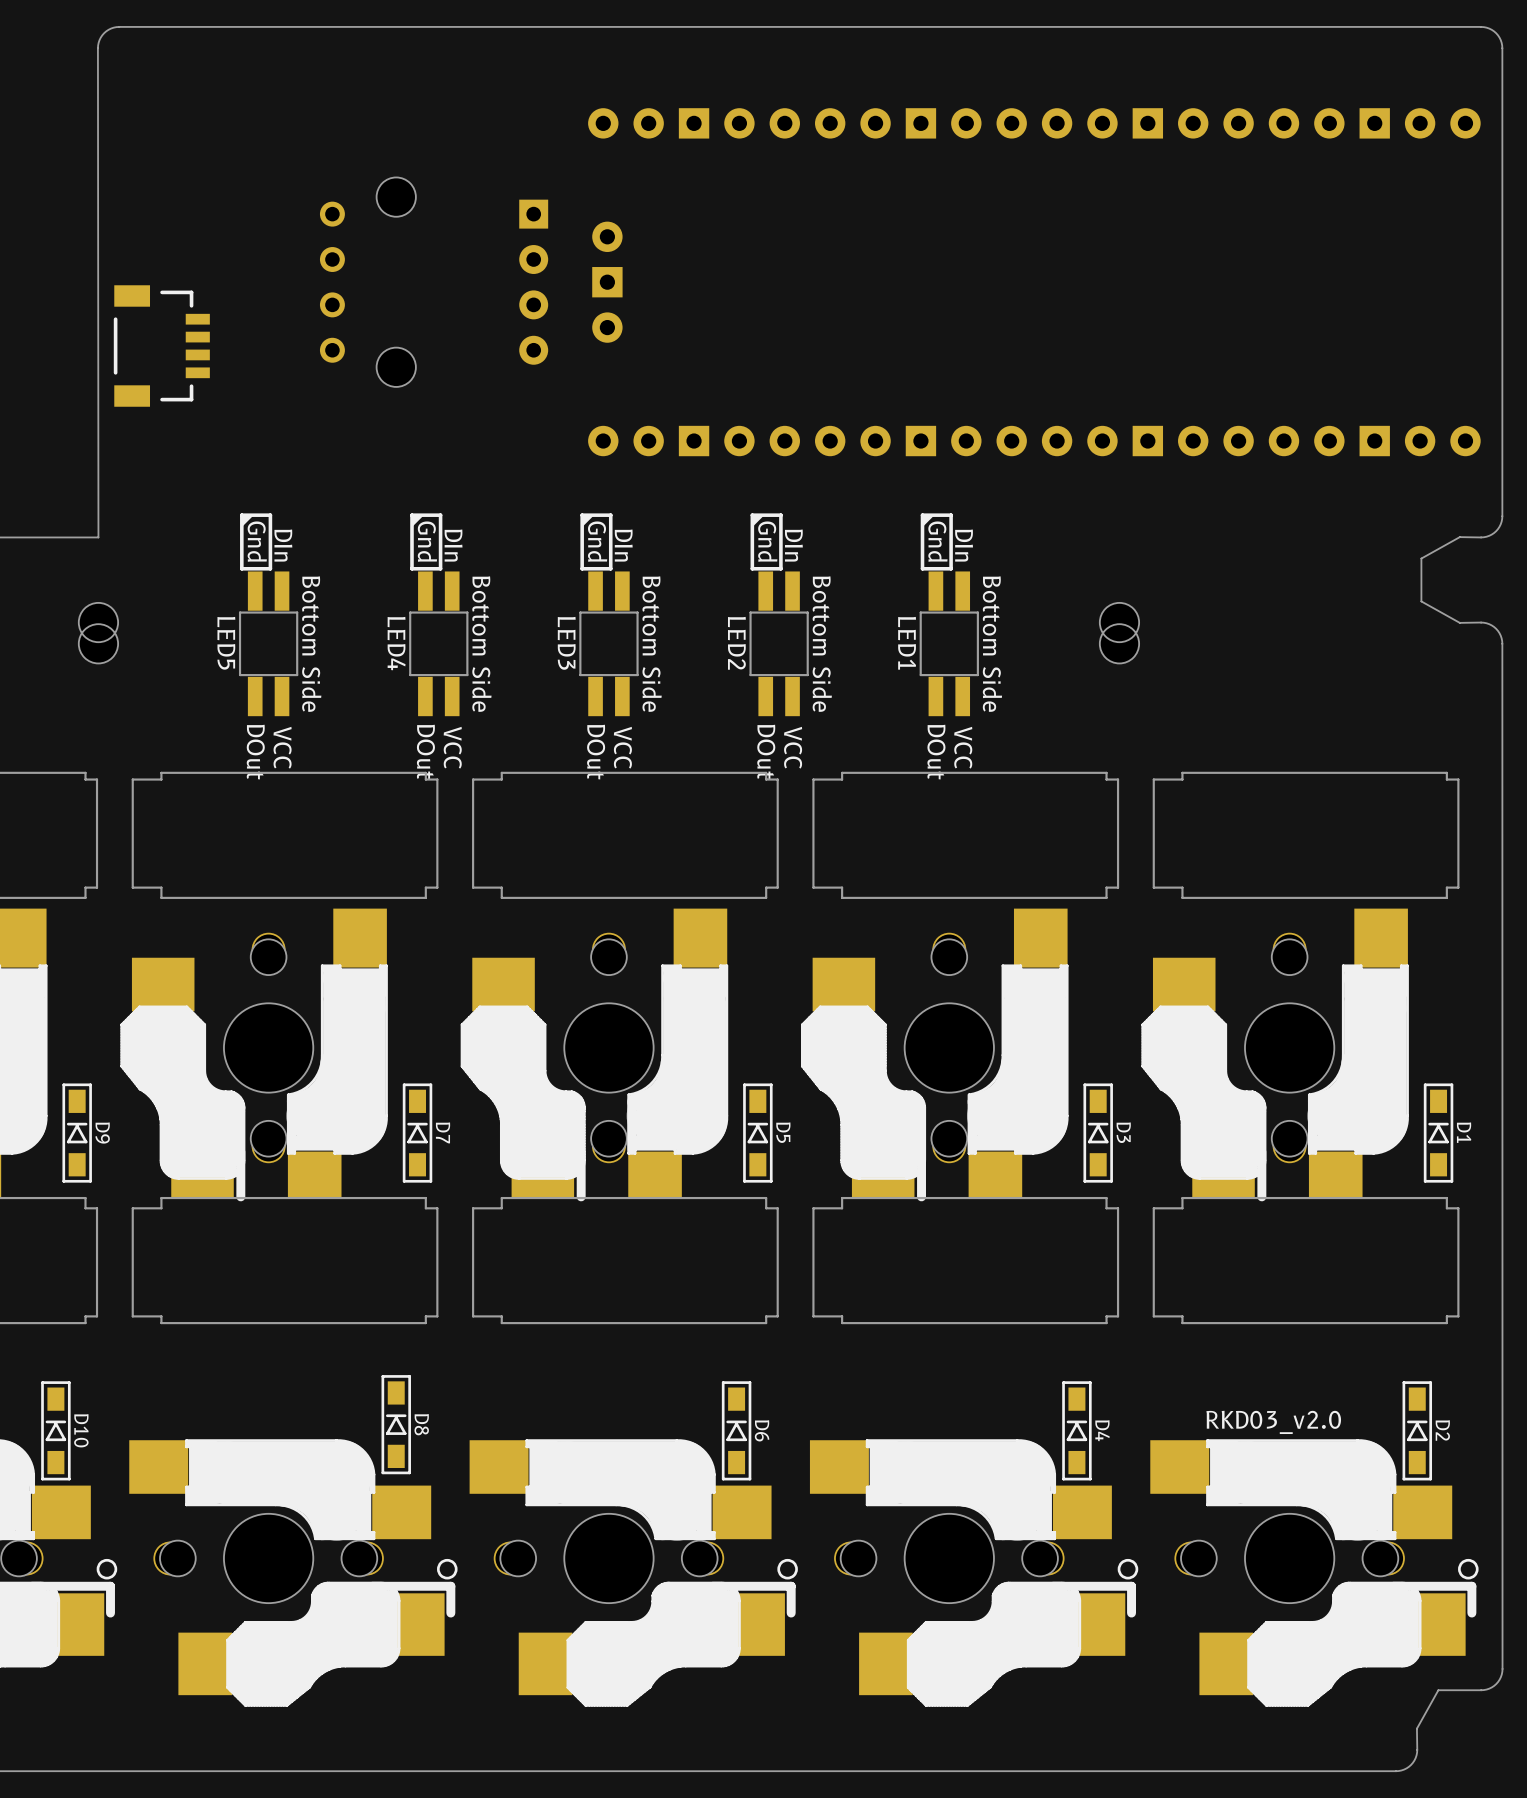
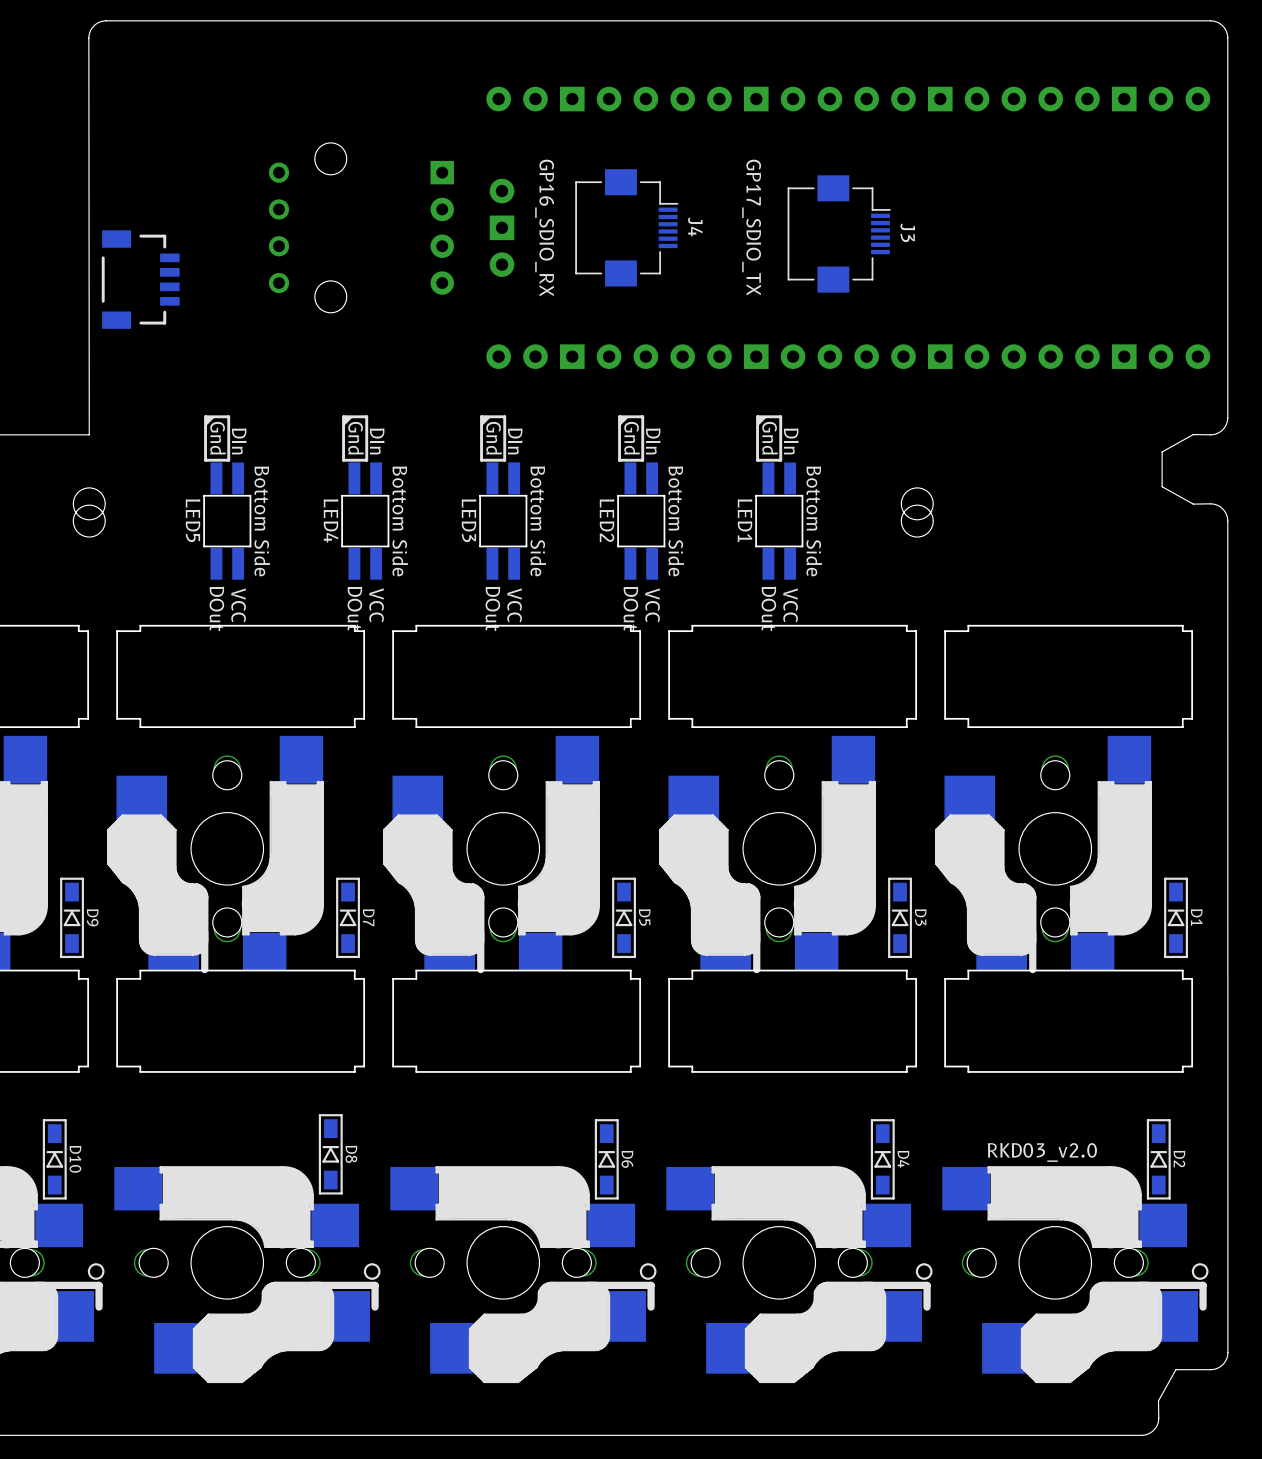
text: none -> GP17_SDIO_TX (751, 227)
text: none -> GP16_SDIO_RX (544, 228)
J4: none -> (626, 227)
J3: none -> (839, 233)

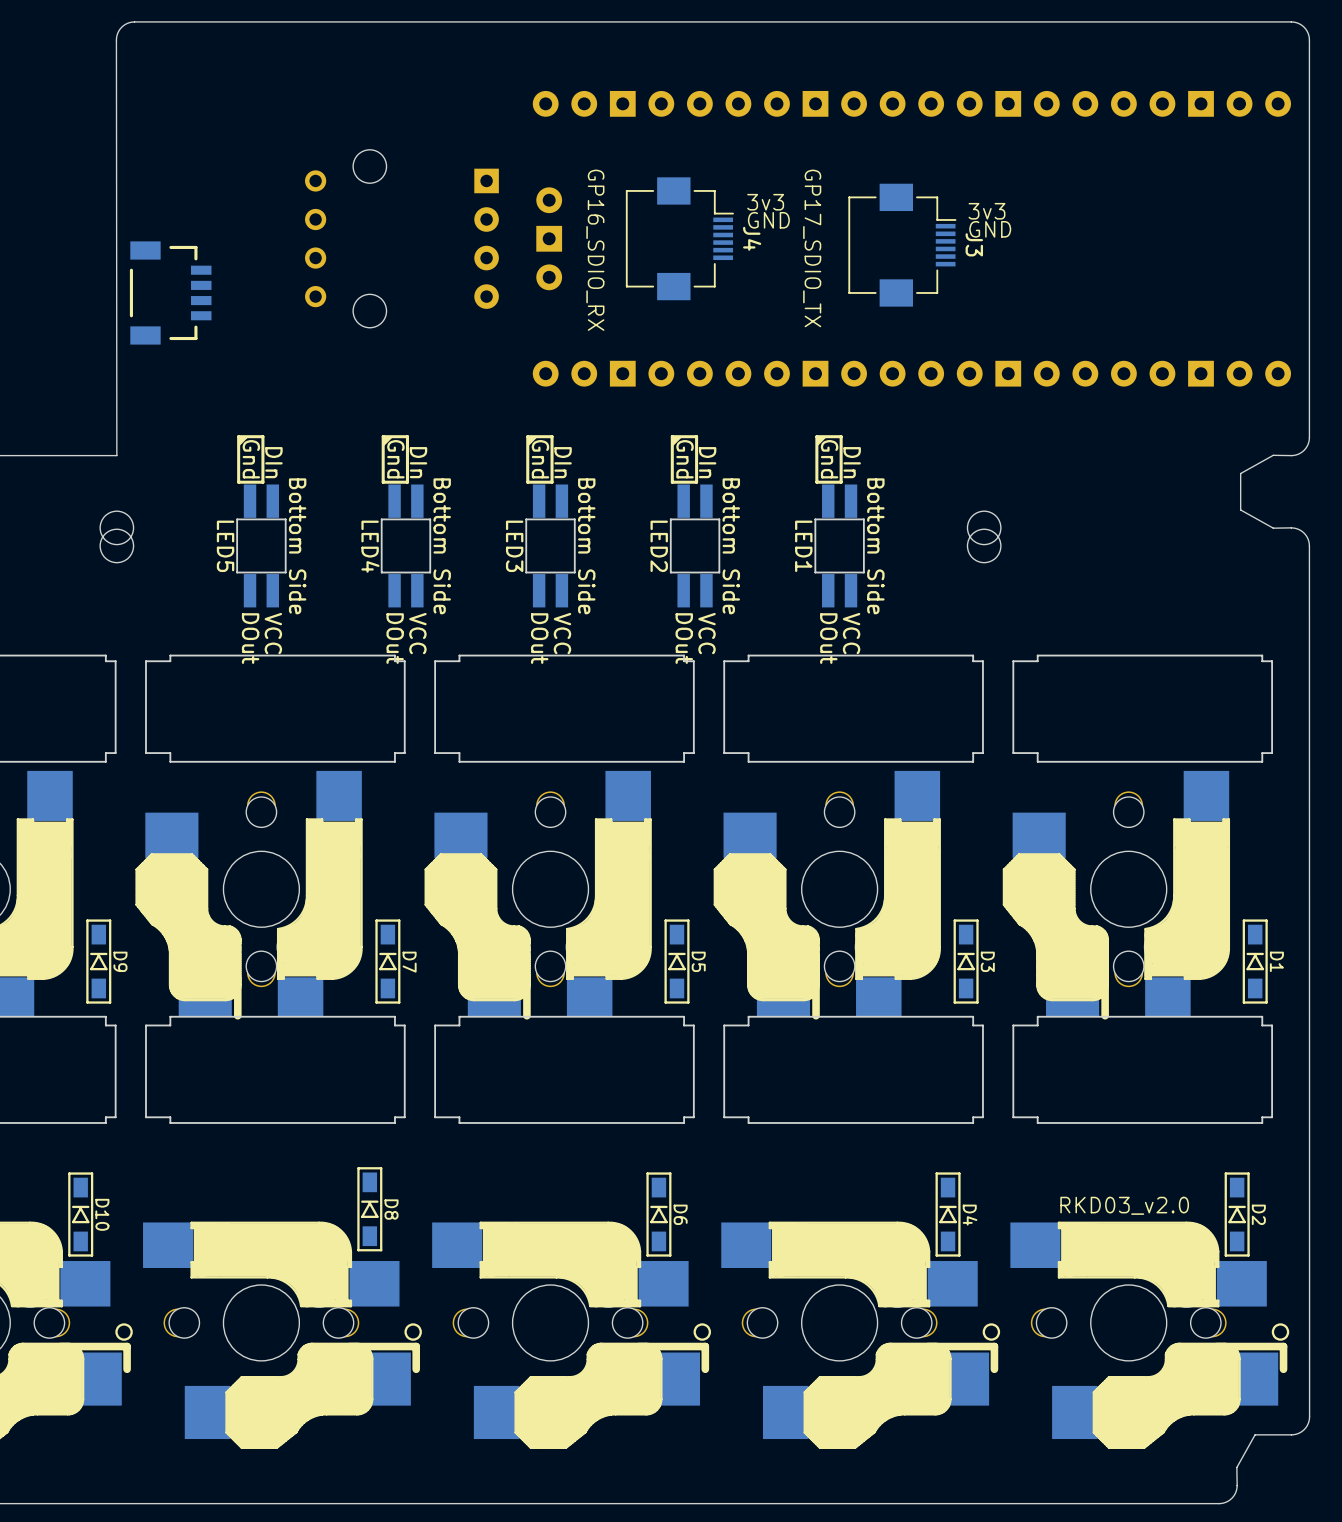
text: none -> 3v3 (765, 202)
text: none -> 3v3 (986, 211)
text: none -> GND (768, 220)
text: none -> GND (990, 229)

